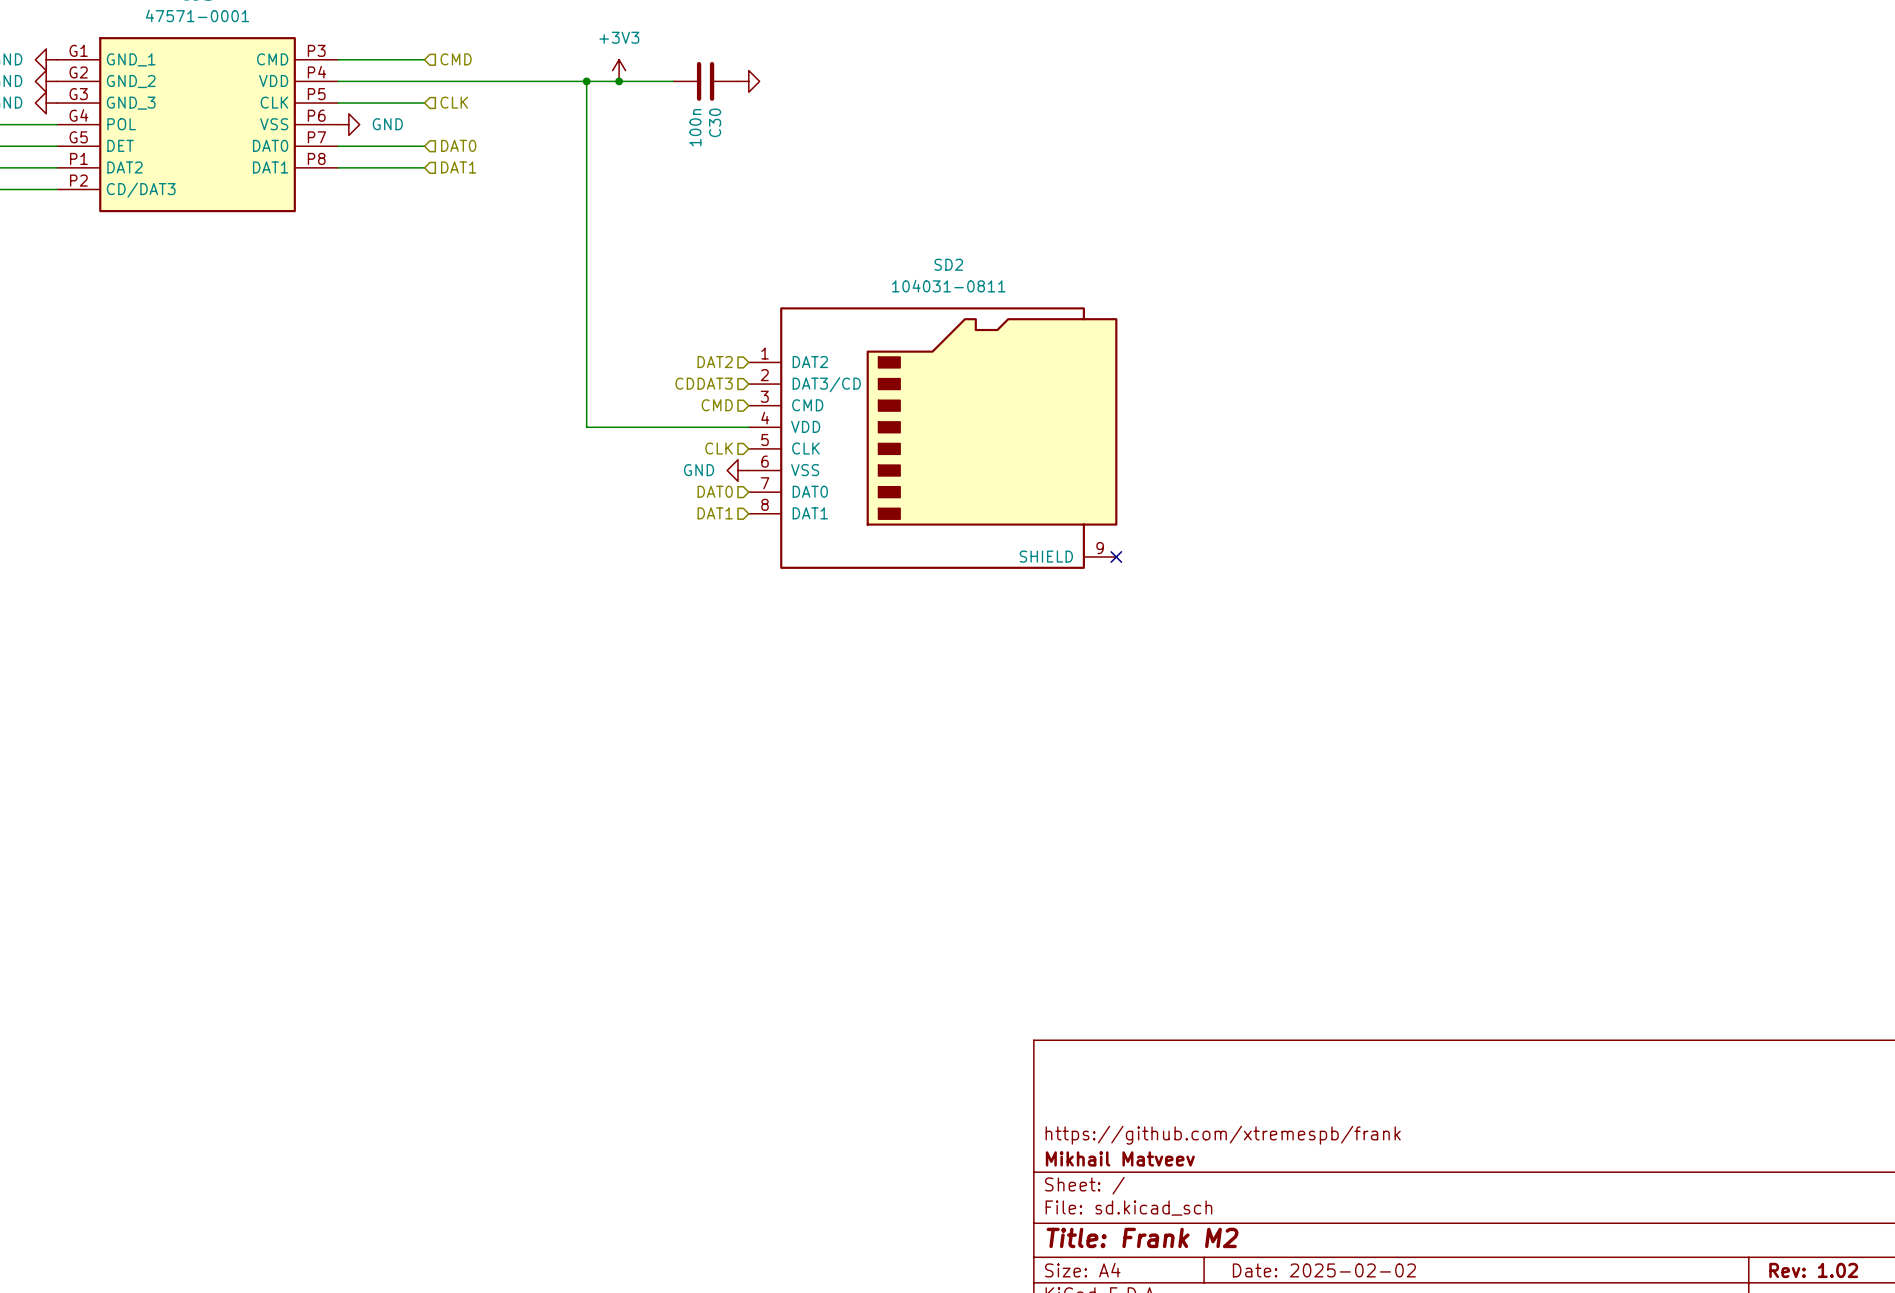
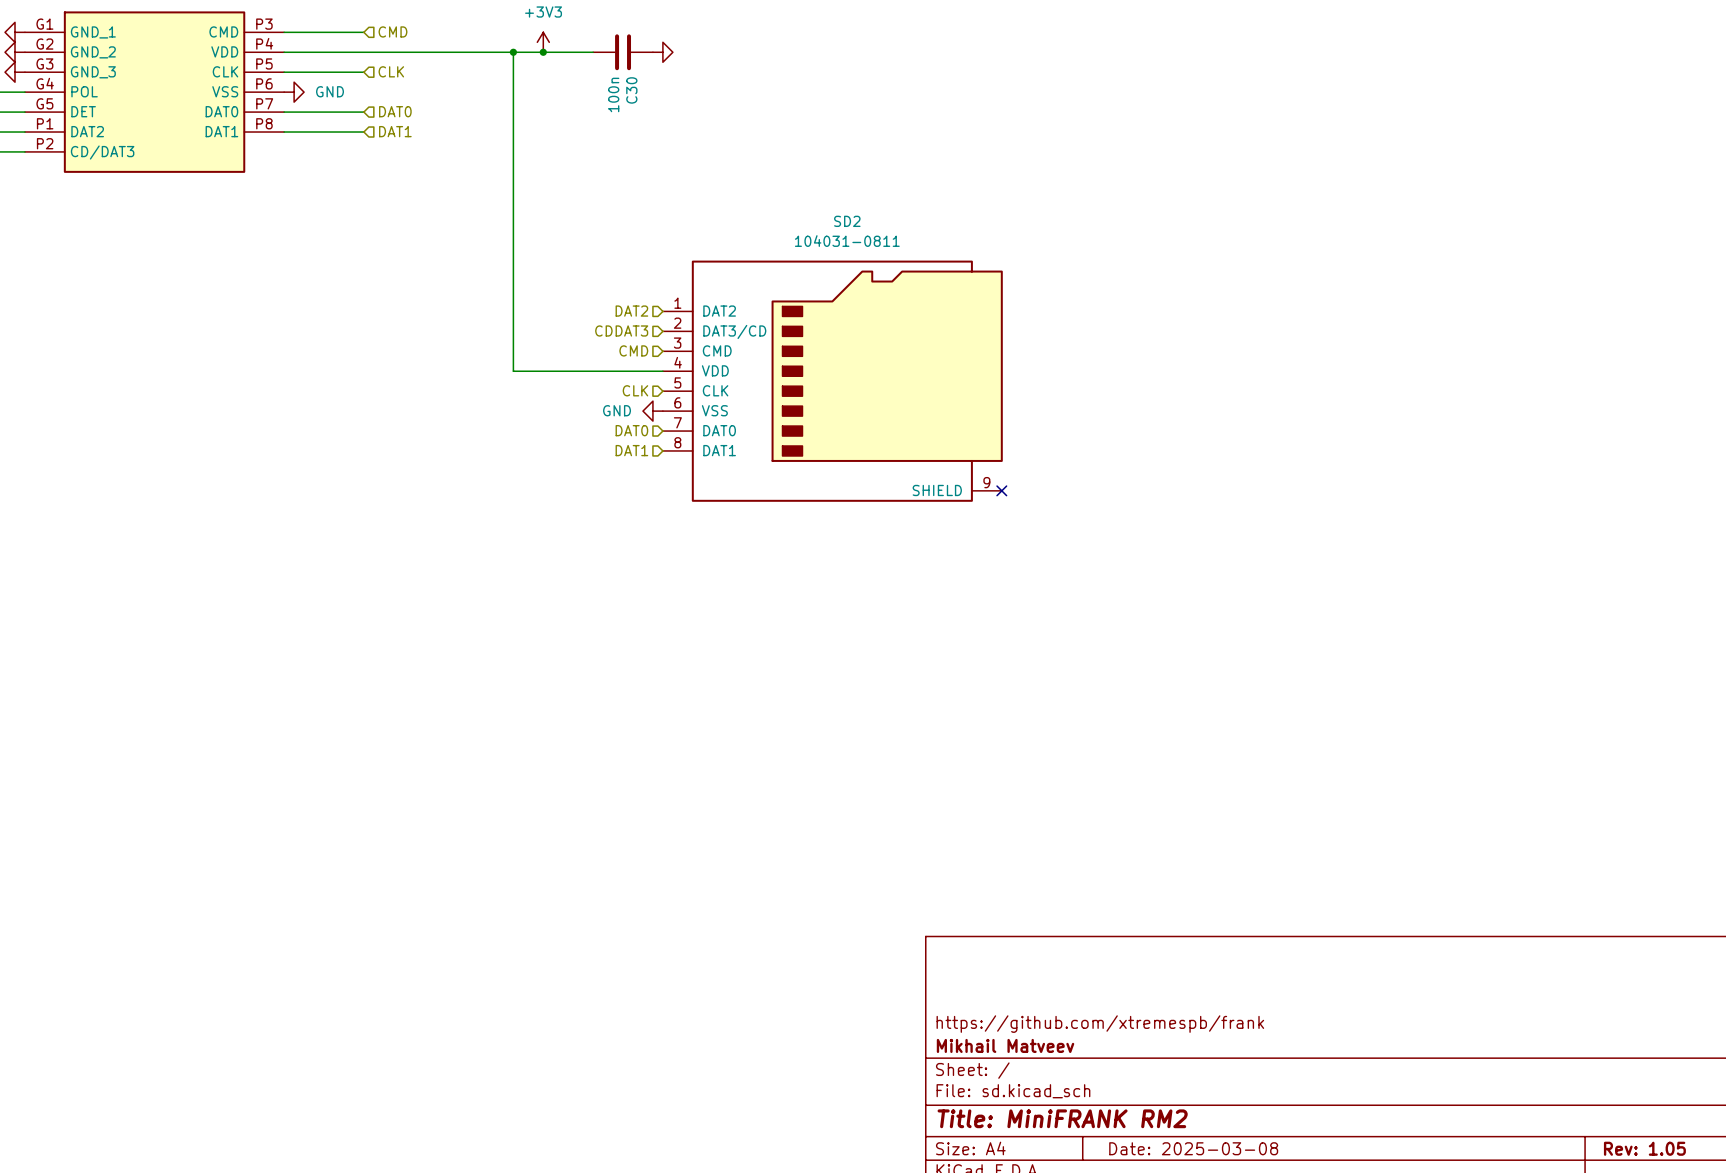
title block: Title: Frank M2 (1142, 1237) -> Title: MiniFRANK RM2 (1062, 1118)
title block: Date: 2025-02-02 (1324, 1270) -> Date: 2025-03-08 (1193, 1148)
title block: Rev: 1.02 (1813, 1270) -> Rev: 1.05 (1644, 1148)

